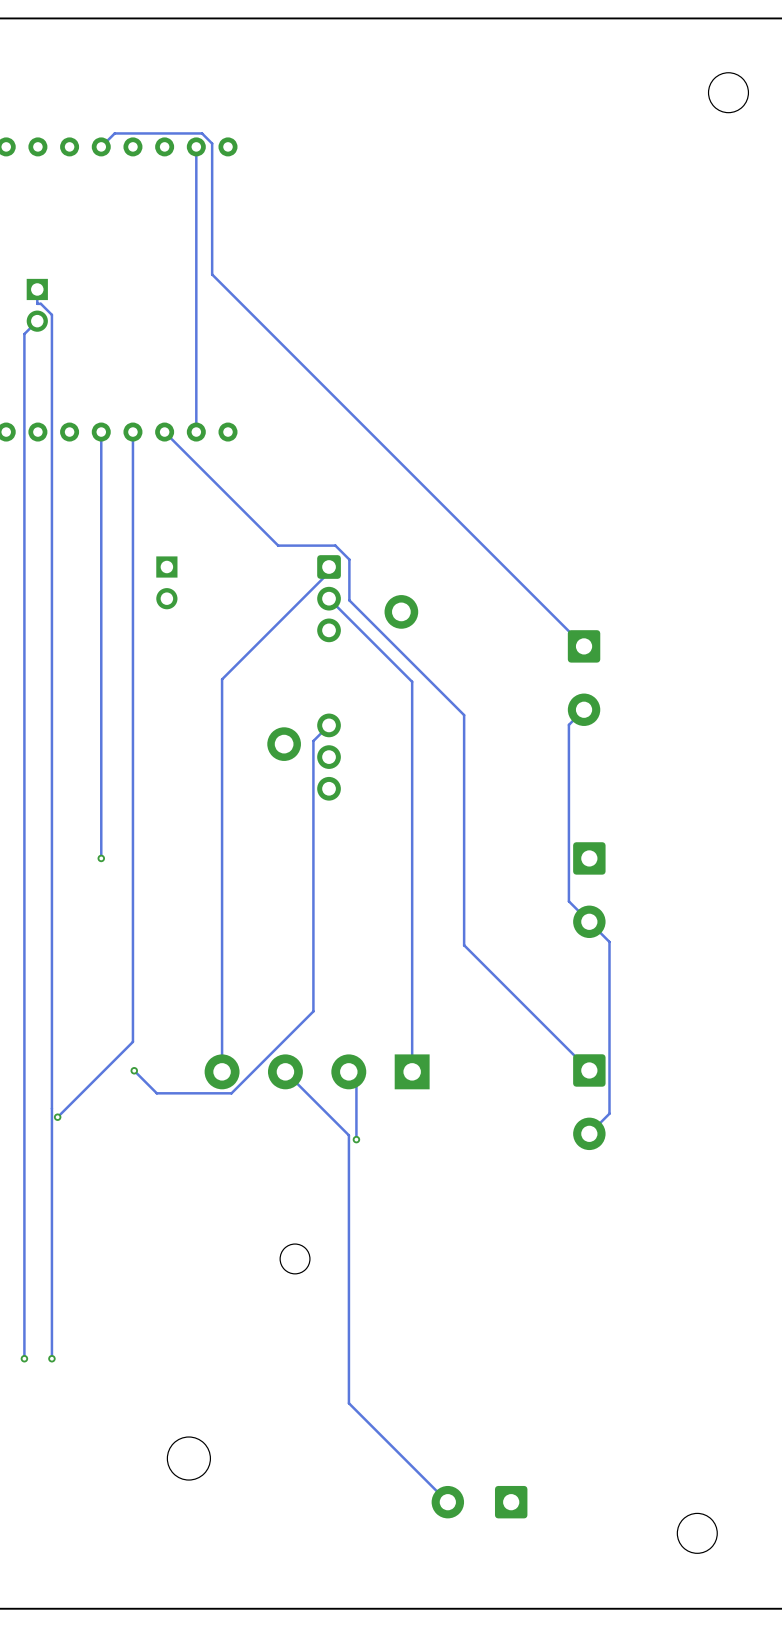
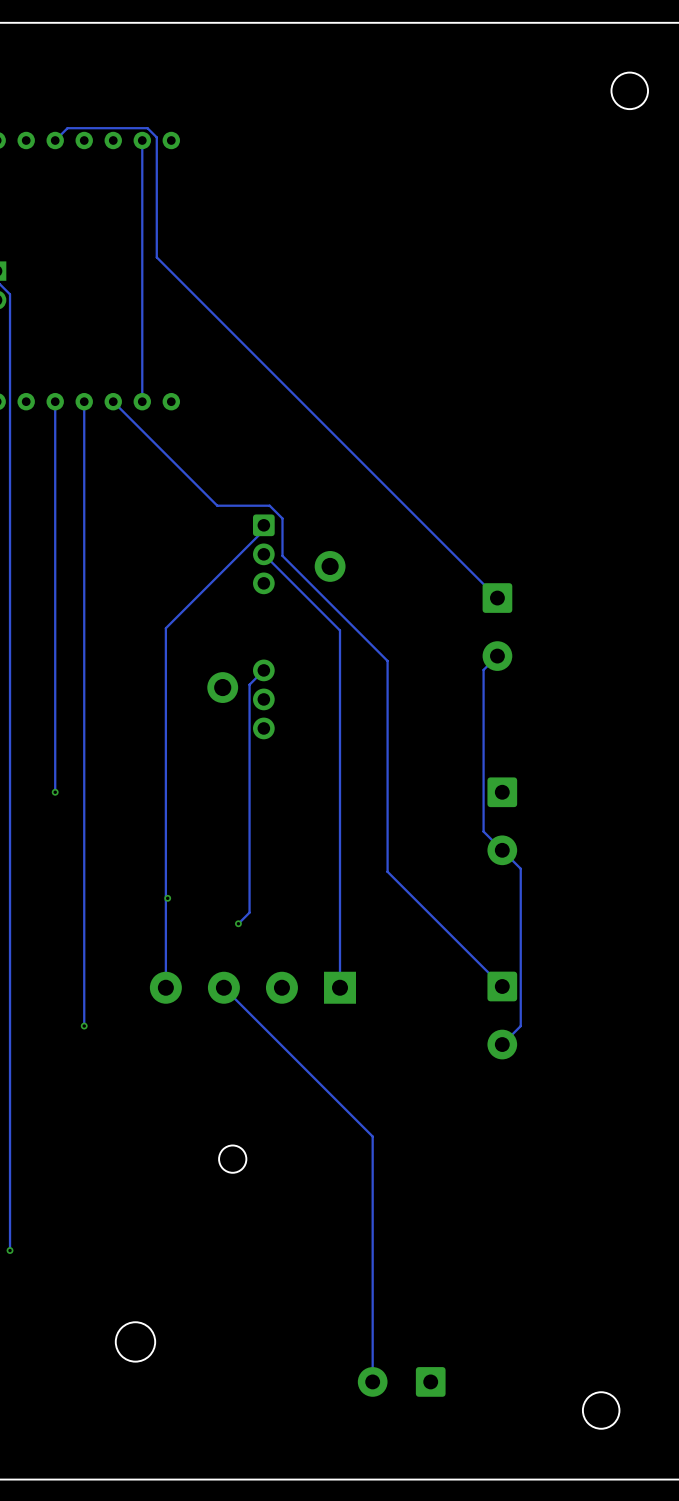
part: (166, 582) -> none
via: none -> (167, 898)
track: (313, 989) (313, 1011) (231, 1093) (156, 1093) (134, 1070) -> (249, 912) (238, 923)
via: none -> (238, 923)
track: (132, 1041) (57, 1117) -> (84, 960) (84, 1026)
via: (134, 1070) -> none
track: (348, 1071) (356, 1079) (356, 1139) -> none
via: none -> (84, 1026)
via: (57, 1117) -> none
track: (348, 1135) (348, 1403) (447, 1502) -> (282, 1045) (372, 1136) (372, 1381)
via: (356, 1139) -> none

